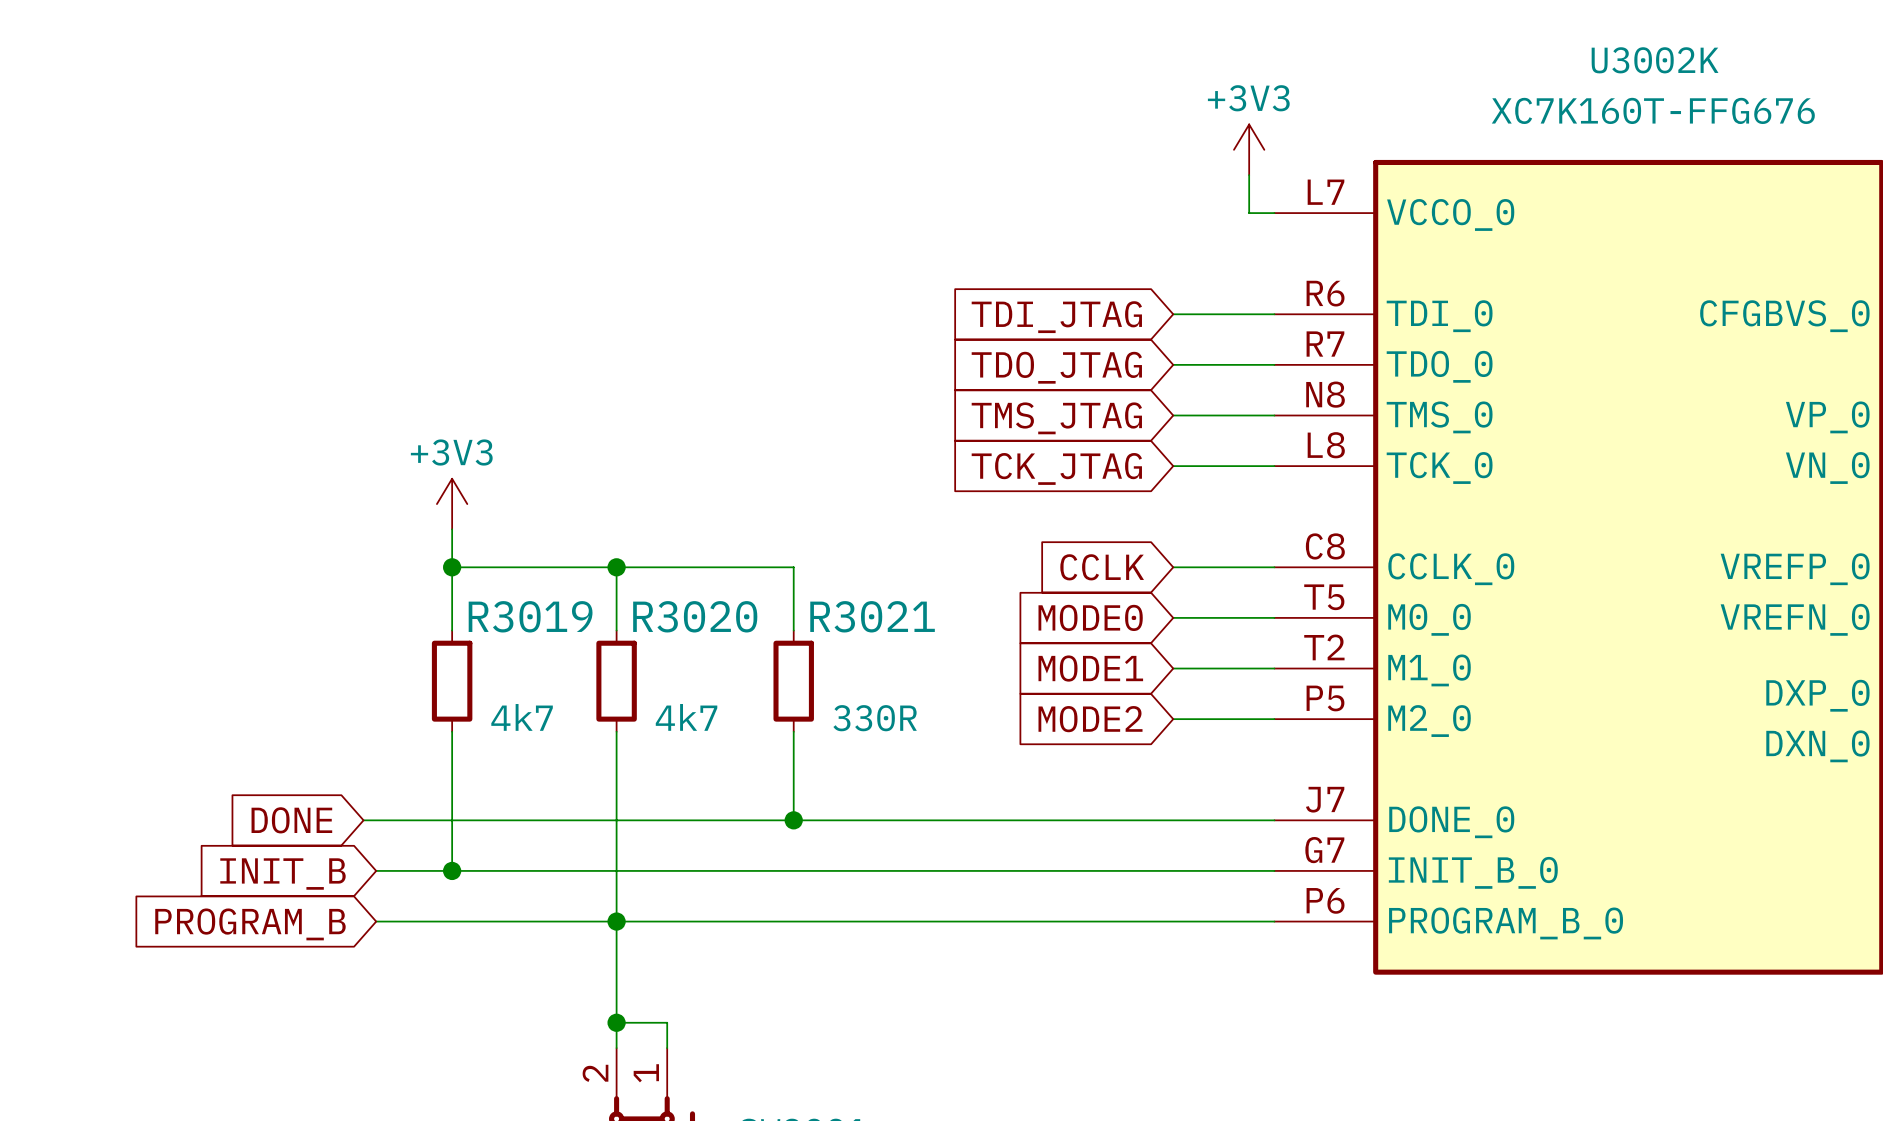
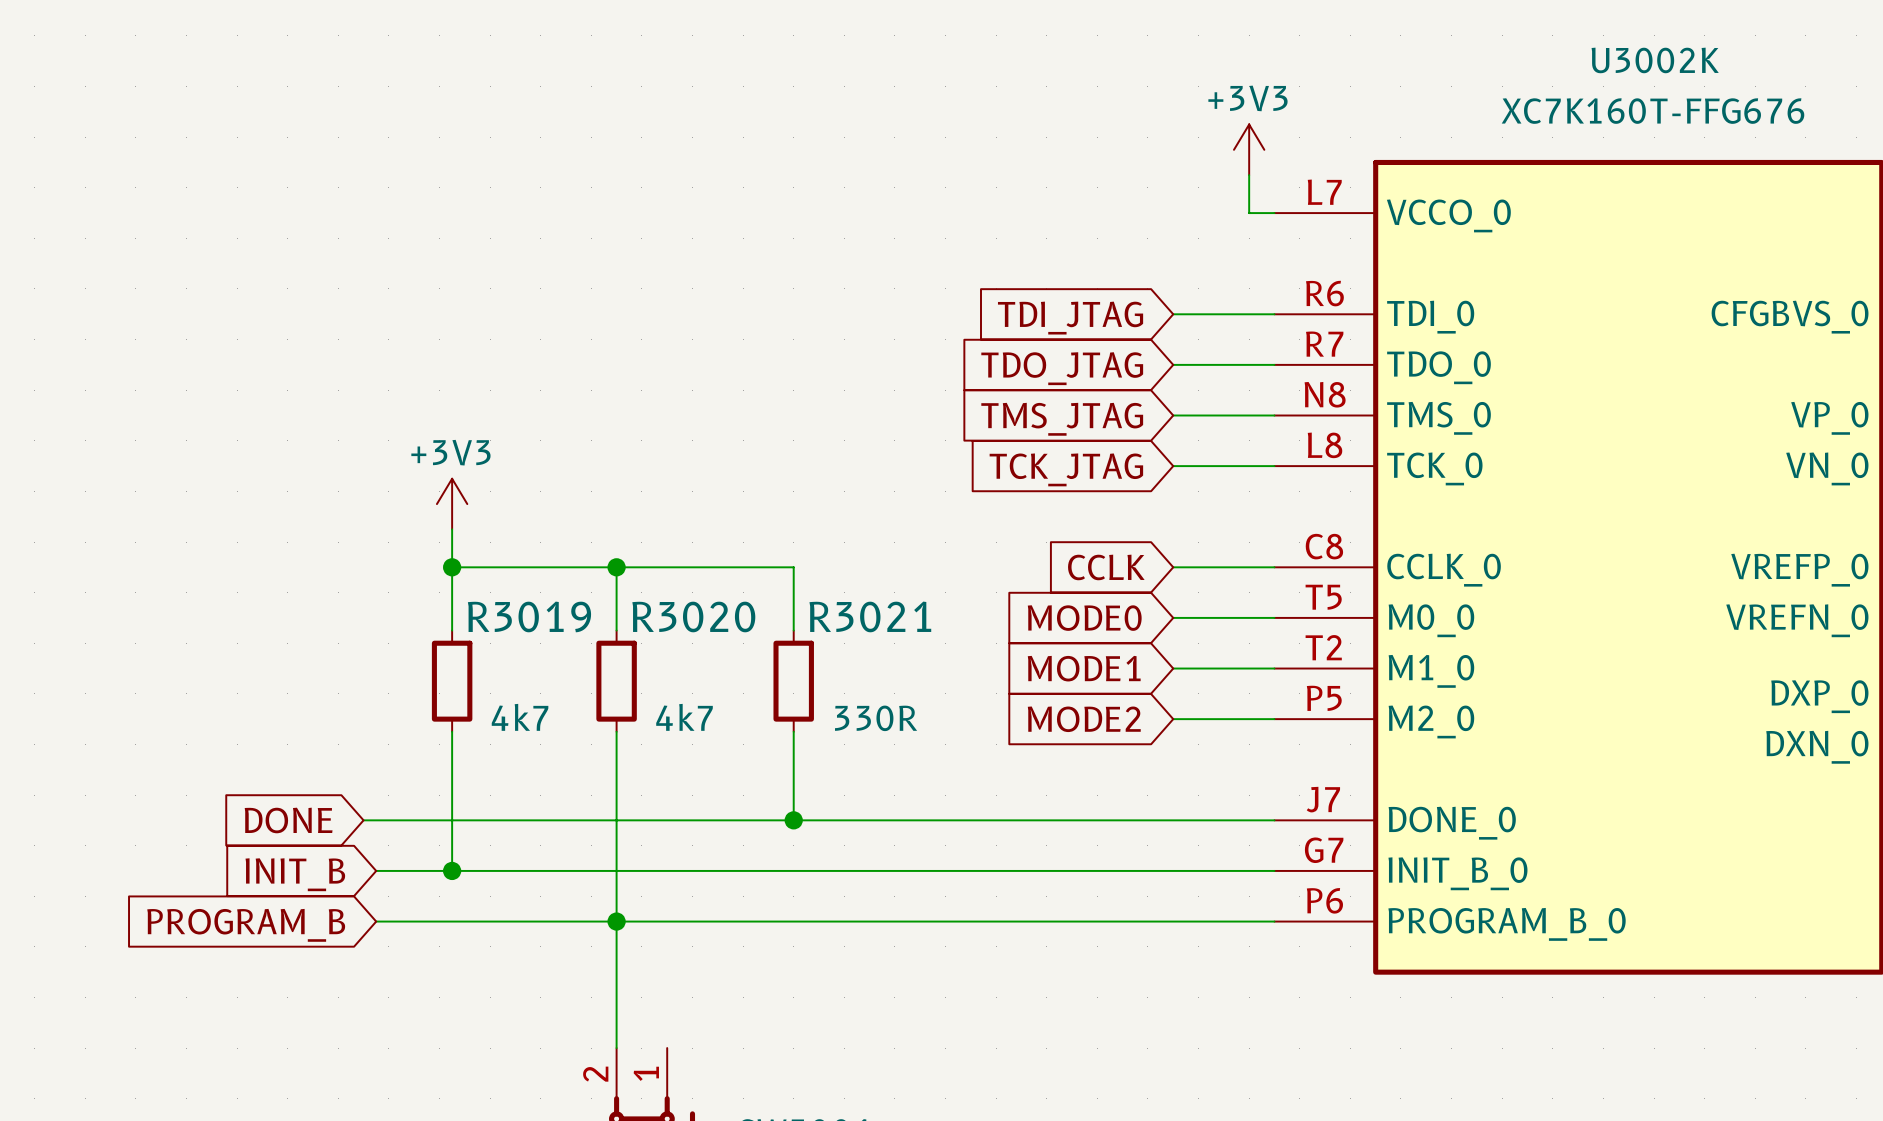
wire: (616, 1022) (667, 1022) (667, 1048) -> none
junction: (616, 1022) -> none

